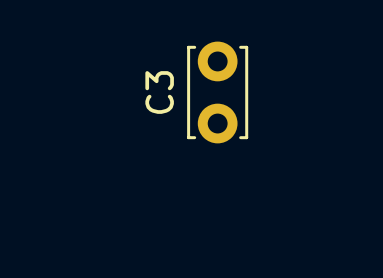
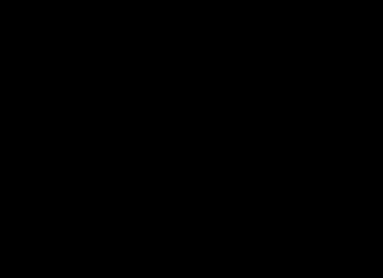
C3: (217, 92) -> none

